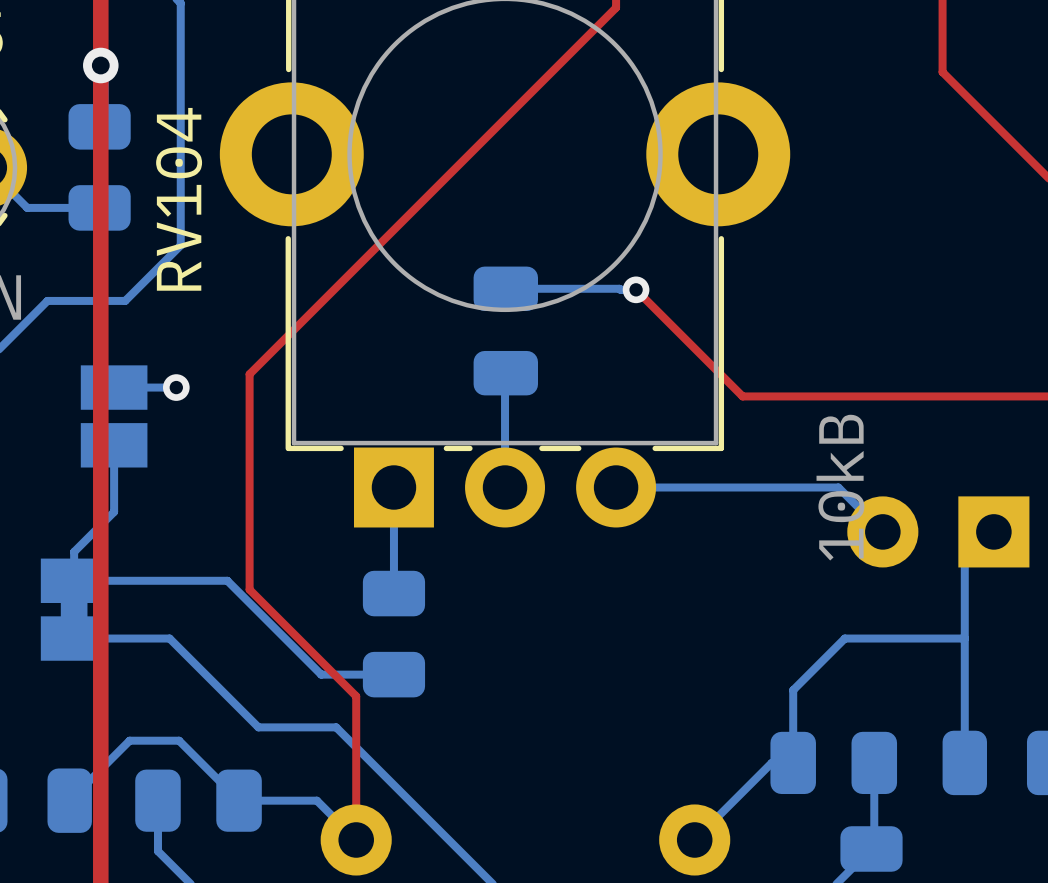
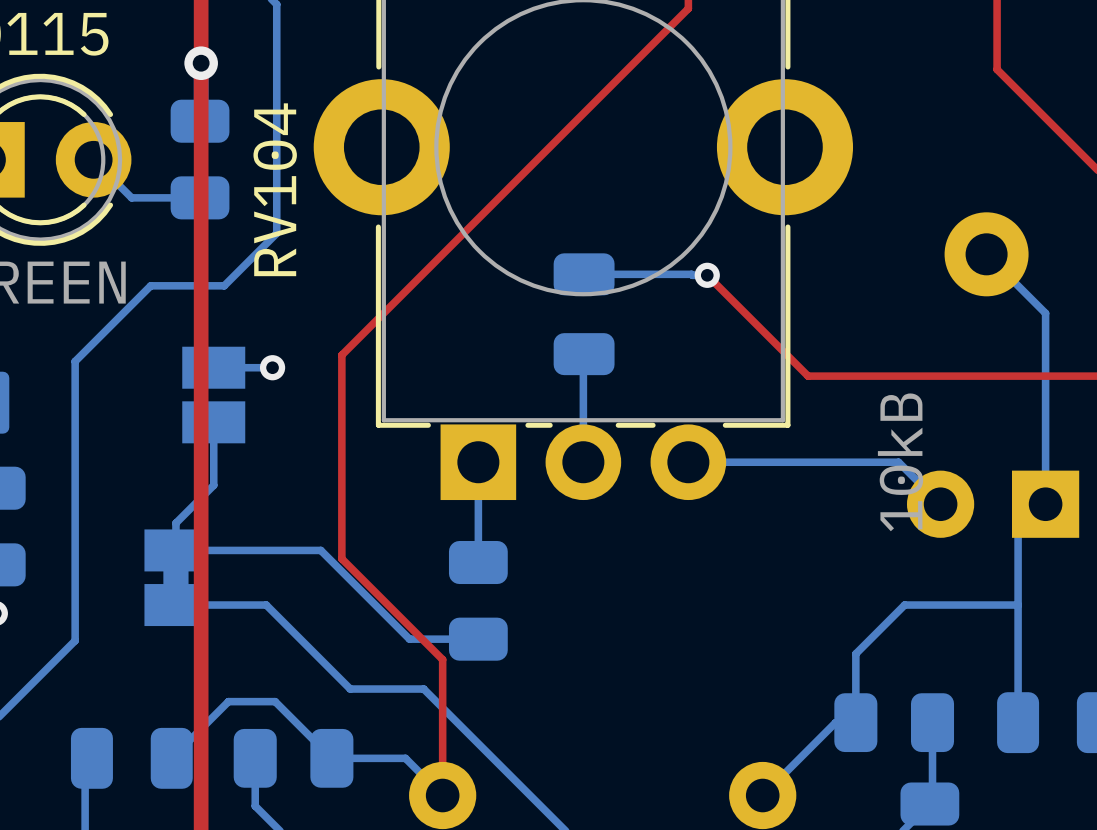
bottom track: none -> (986, 254) (1045, 313) (1045, 504)
part: none -> (986, 254)

